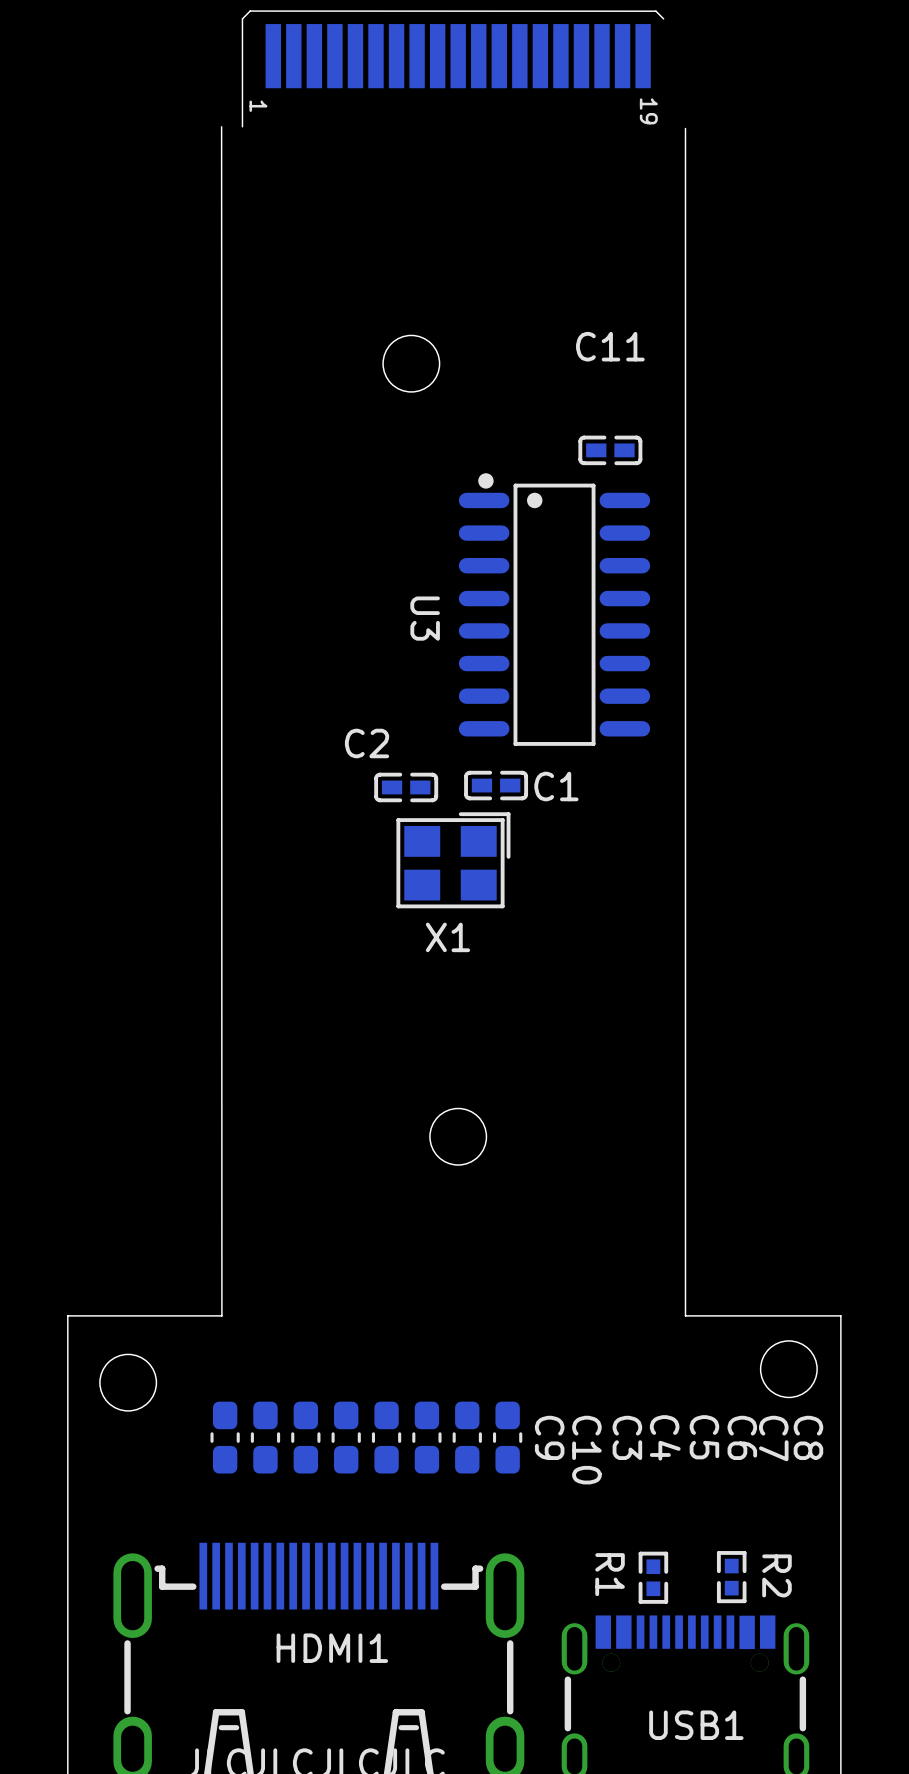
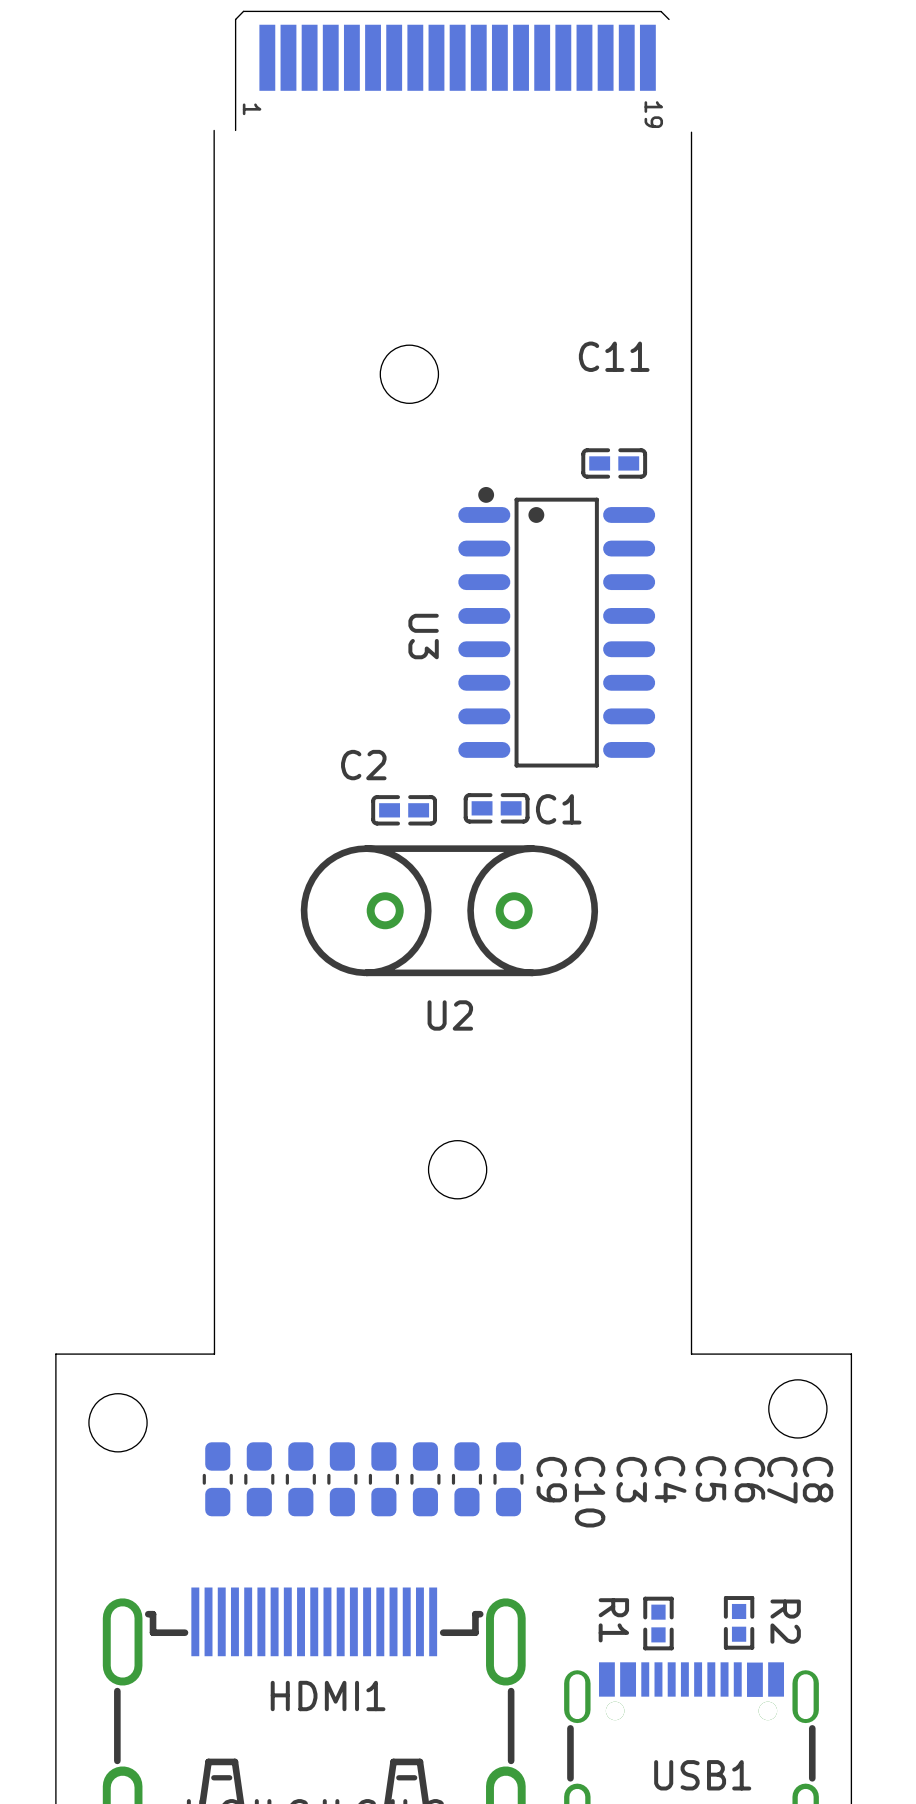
X1: (453, 860) -> none
U2: none -> (449, 910)

